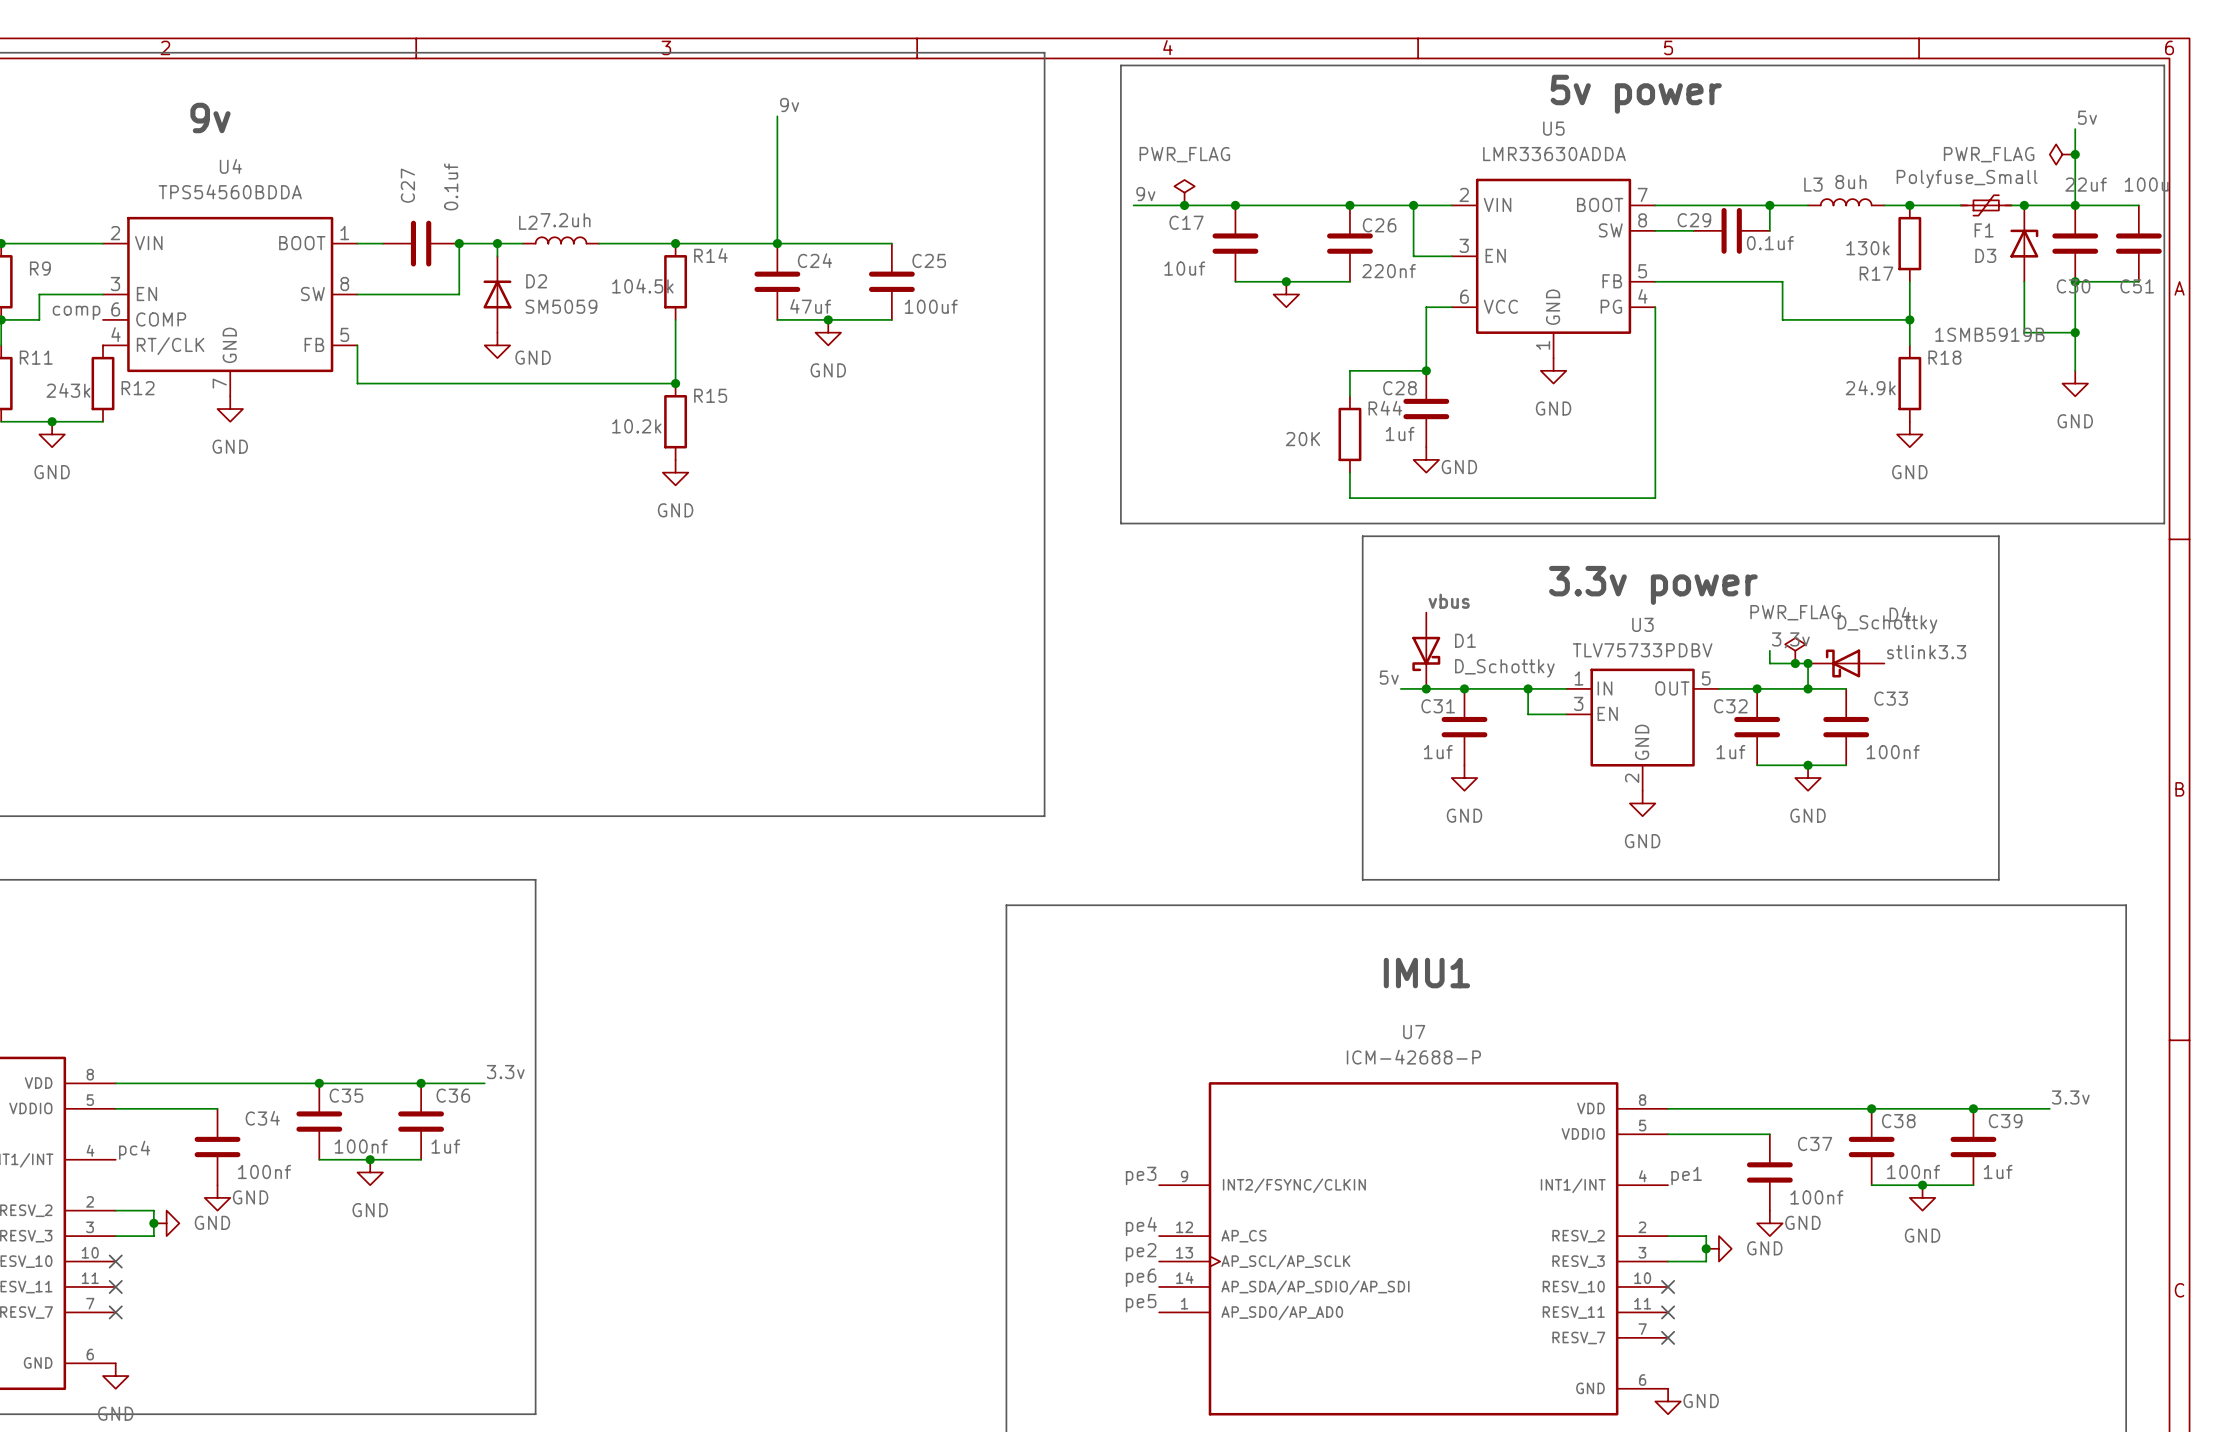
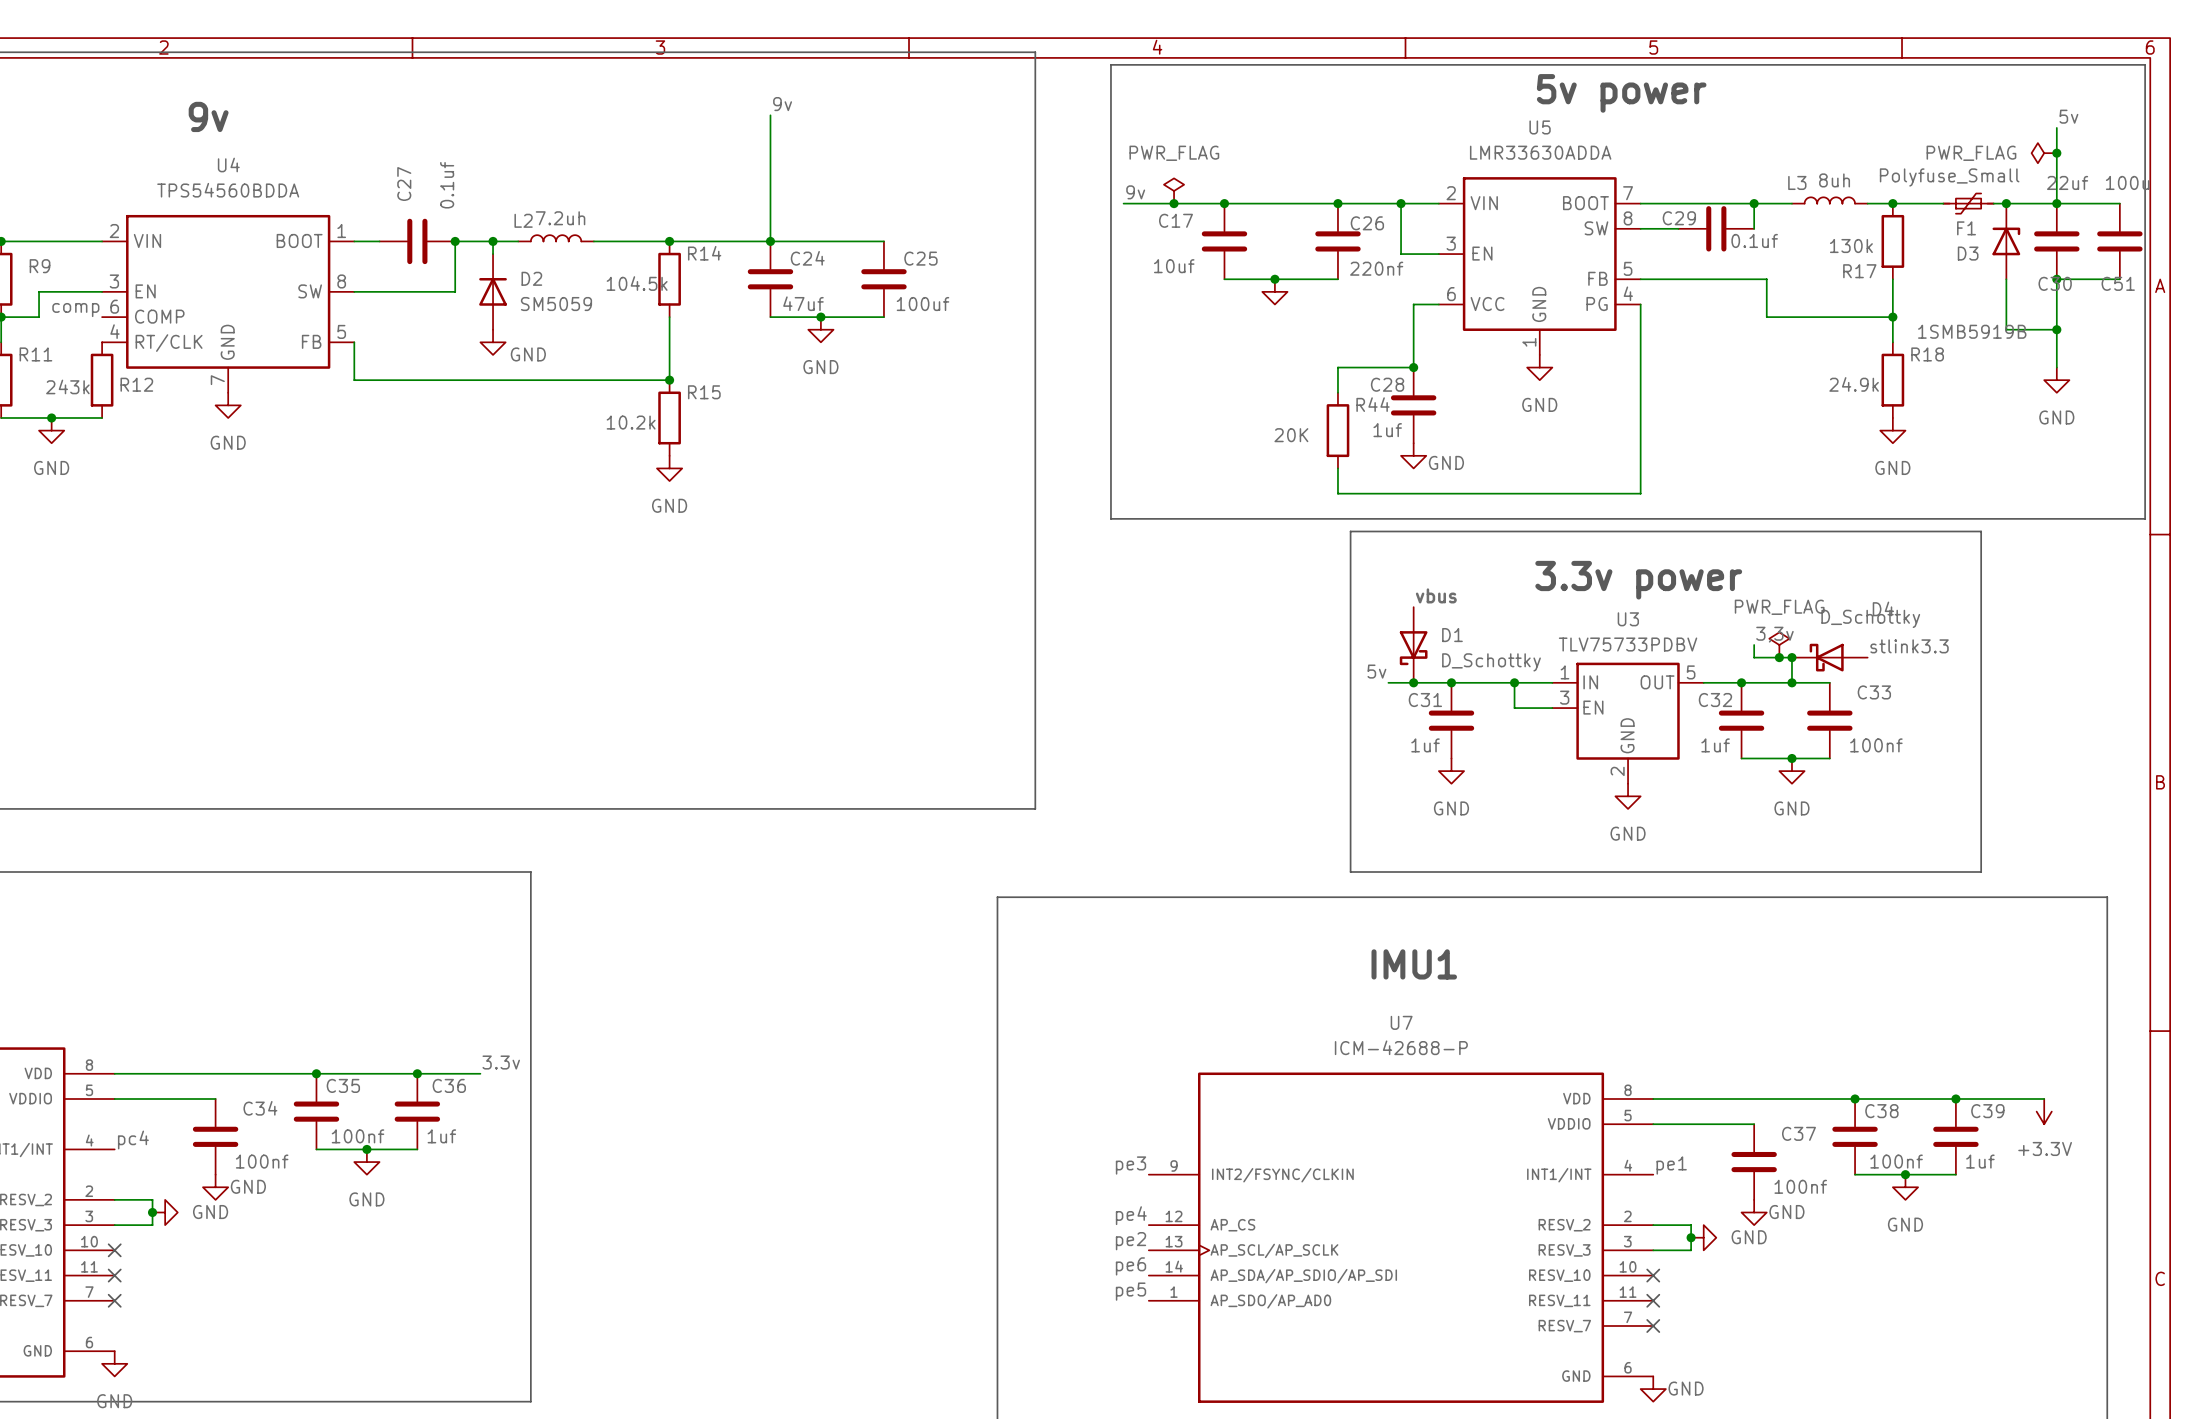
label: 3.3v (2070, 1097) -> none
wire: none -> (2031, 1098) (2044, 1098)
power symbol: none -> +3.3V (2044, 1111)

